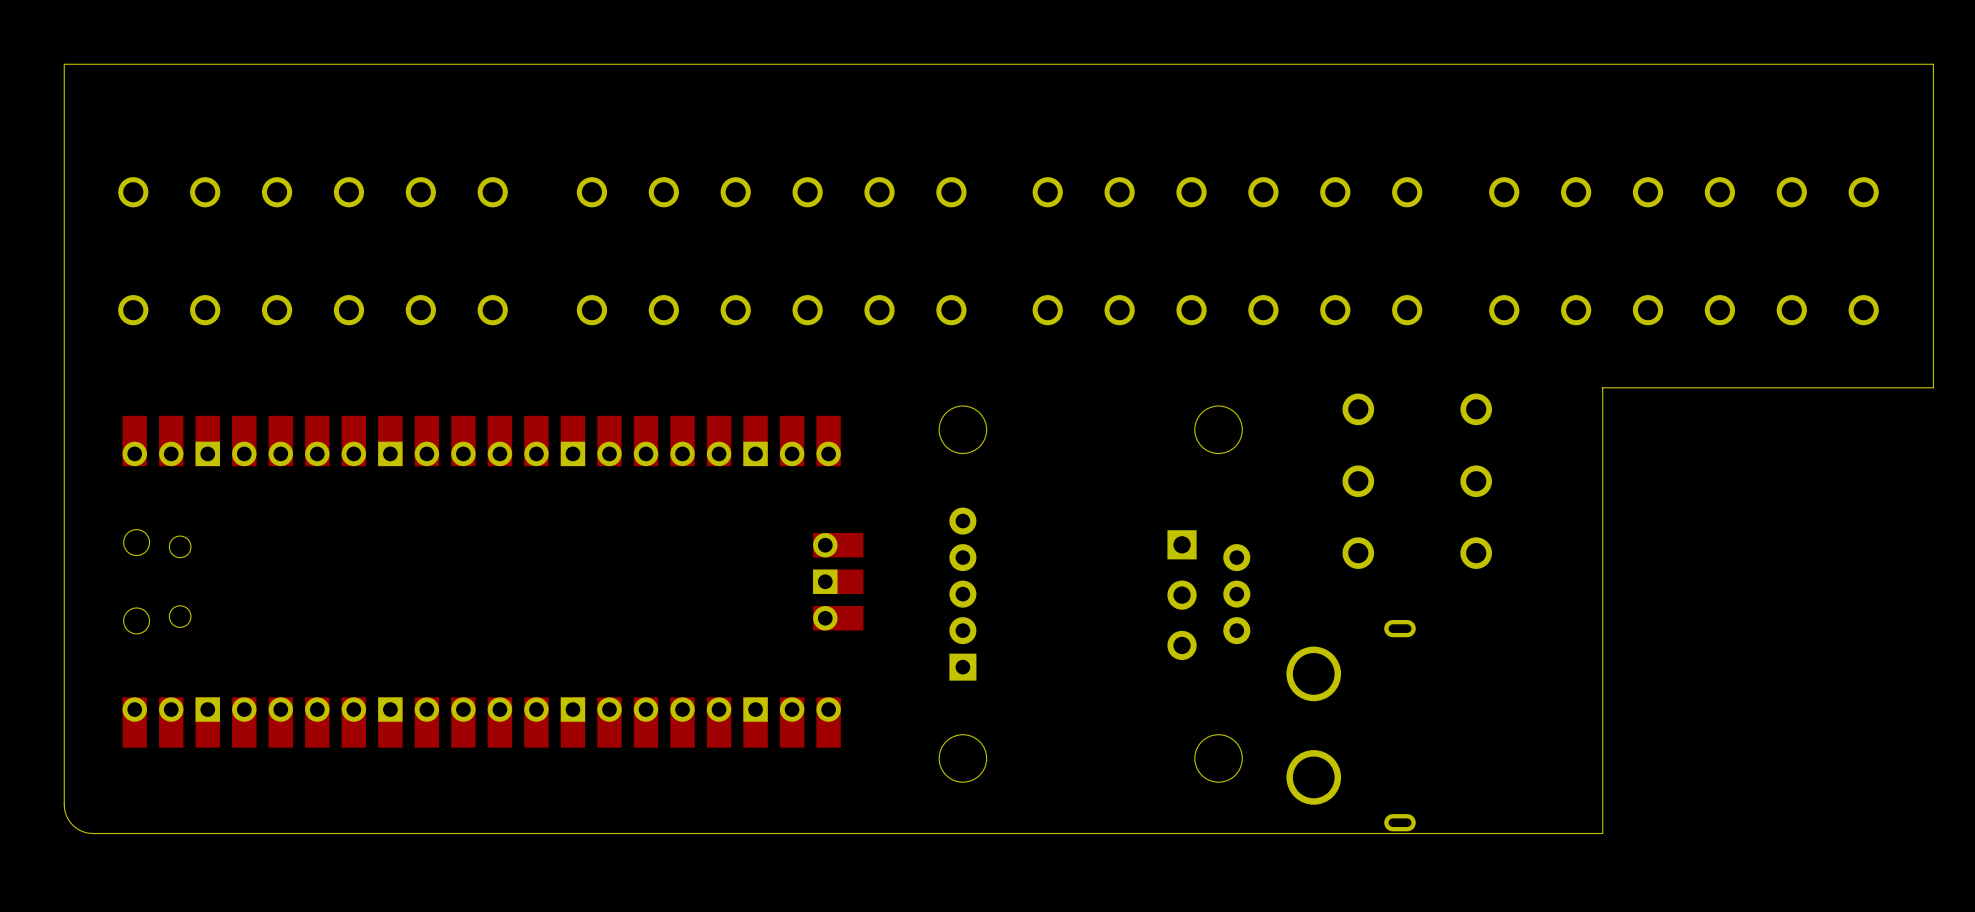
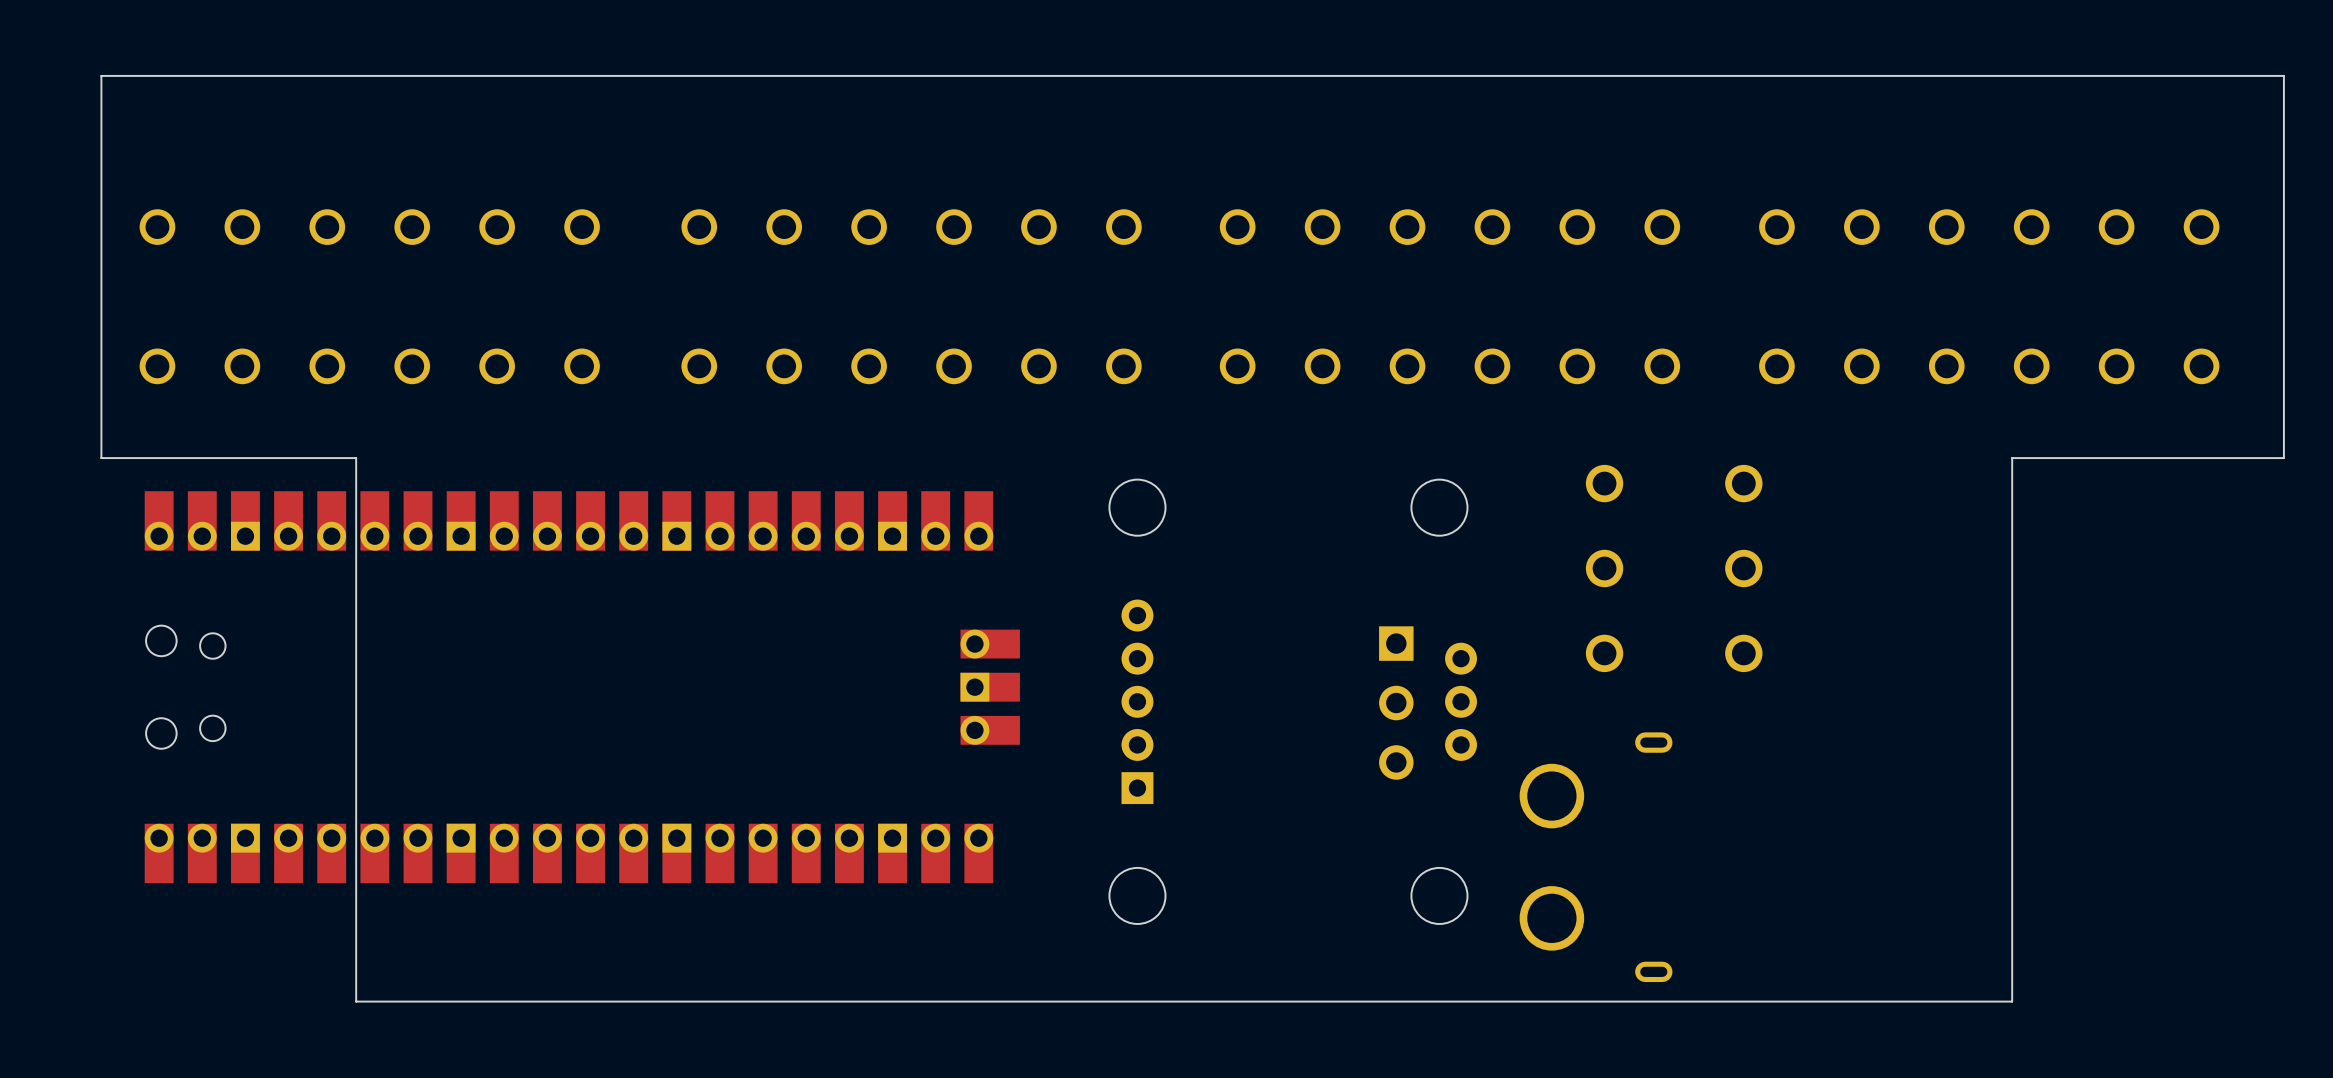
board edge: (85, 64) (64, 64) (64, 804) (65, 814) (70, 822) (77, 829) (86, 832) (1602, 833) (1602, 387) (1703, 387) -> (101, 75) (101, 458) (356, 458) (356, 1001) (2012, 1001) (2012, 458)

